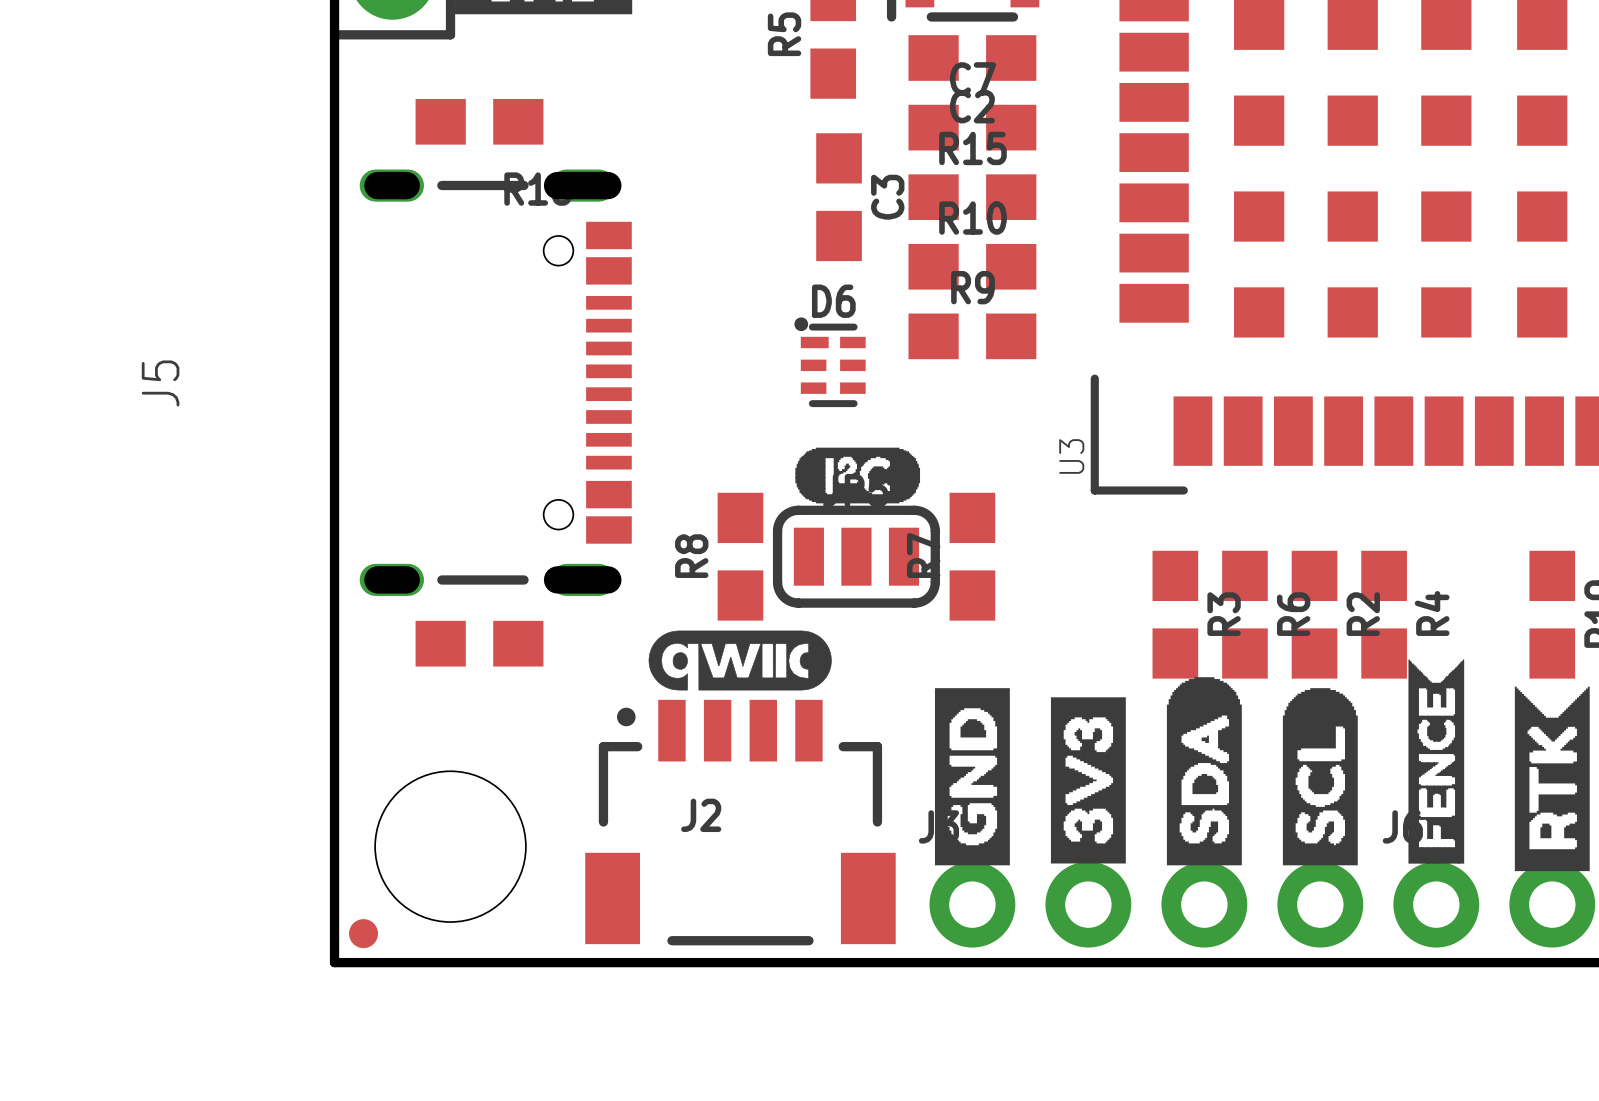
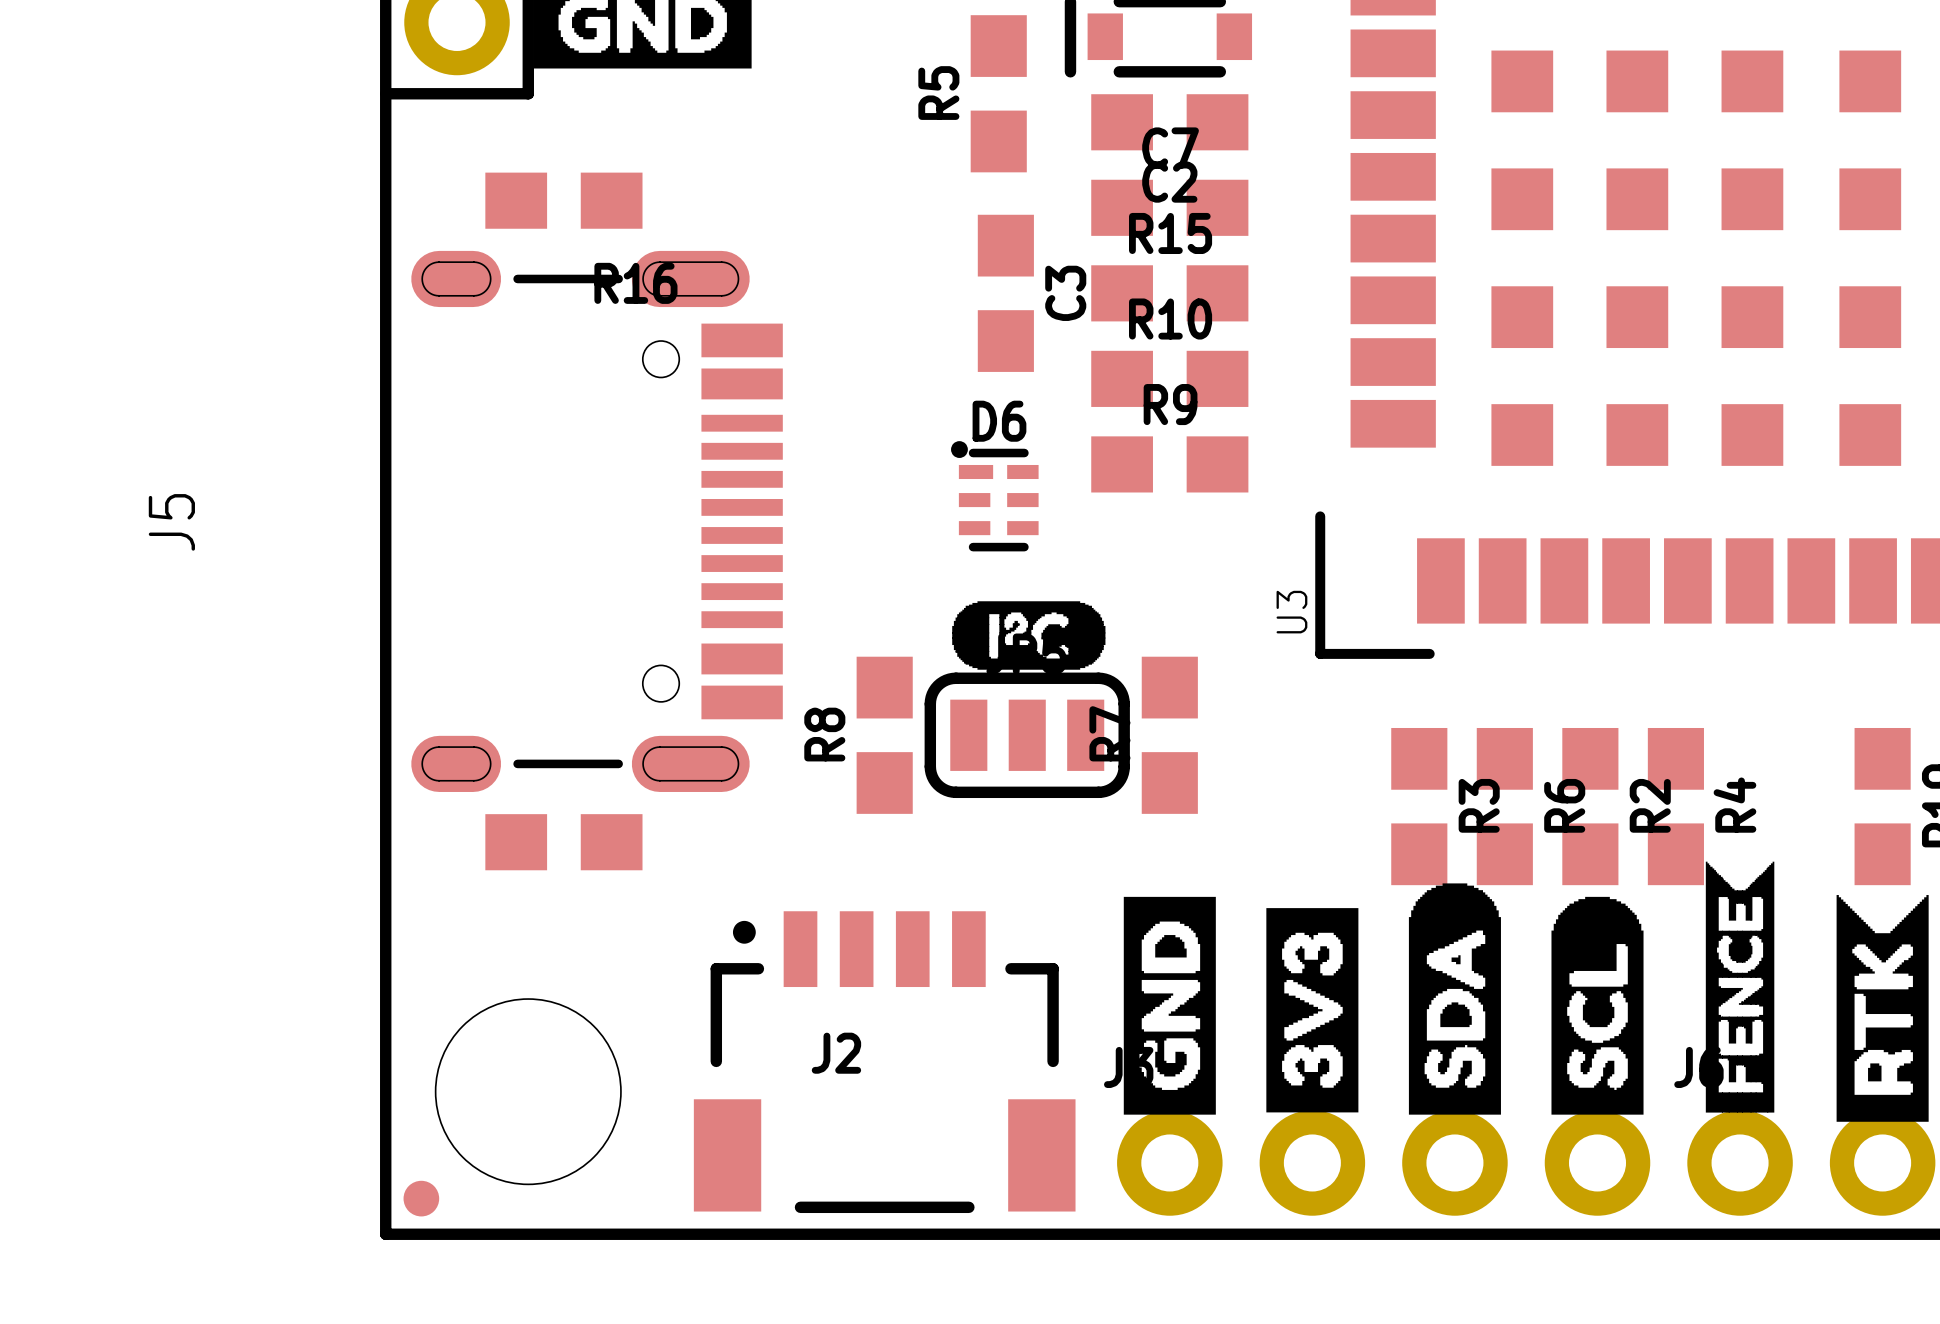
J5 footprint: [359, 169, 632, 596] -> [411, 250, 783, 792]
drawing: [648, 630, 832, 691] -> none

